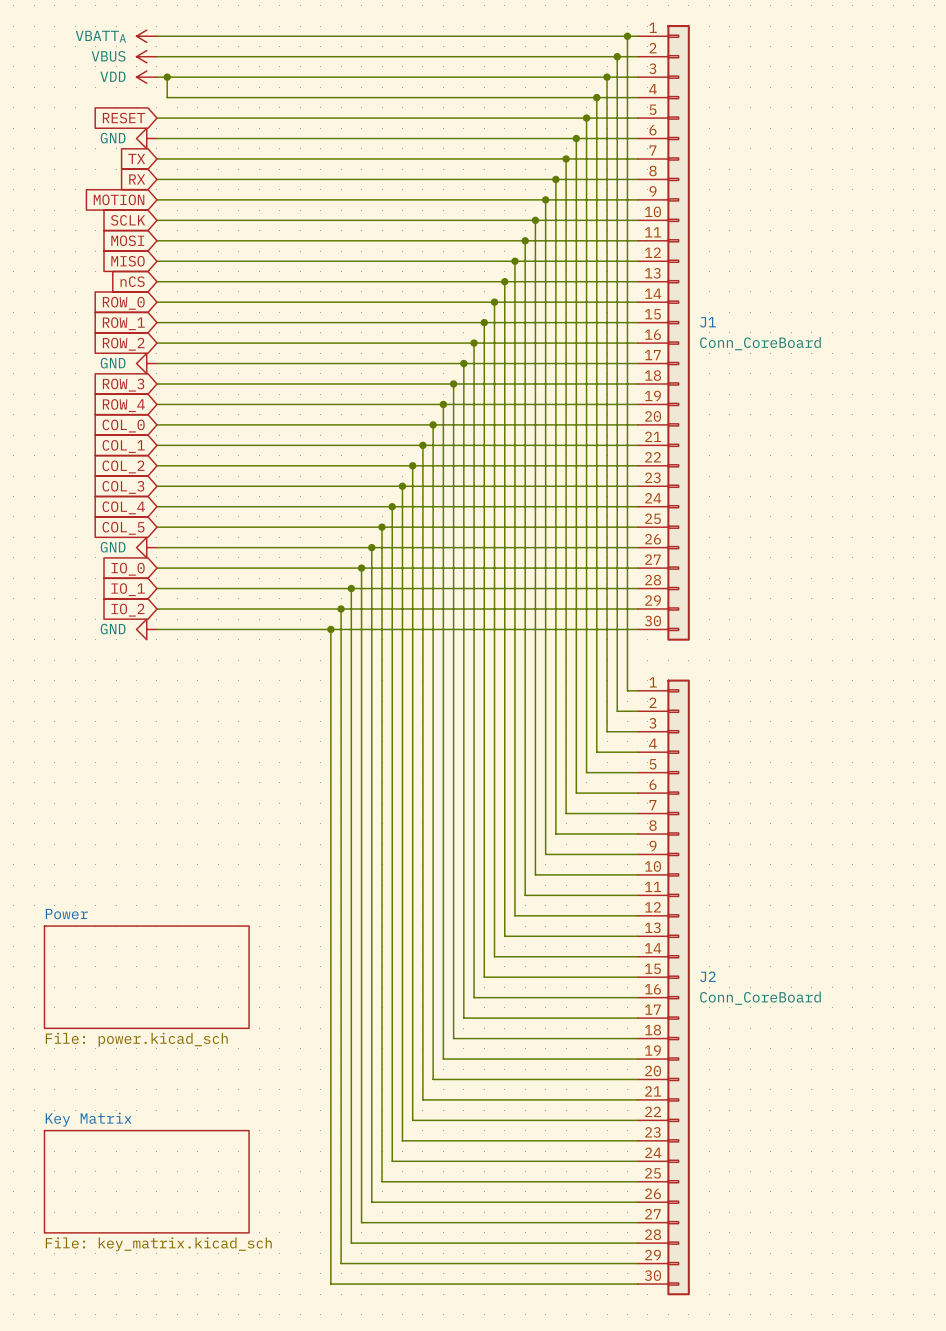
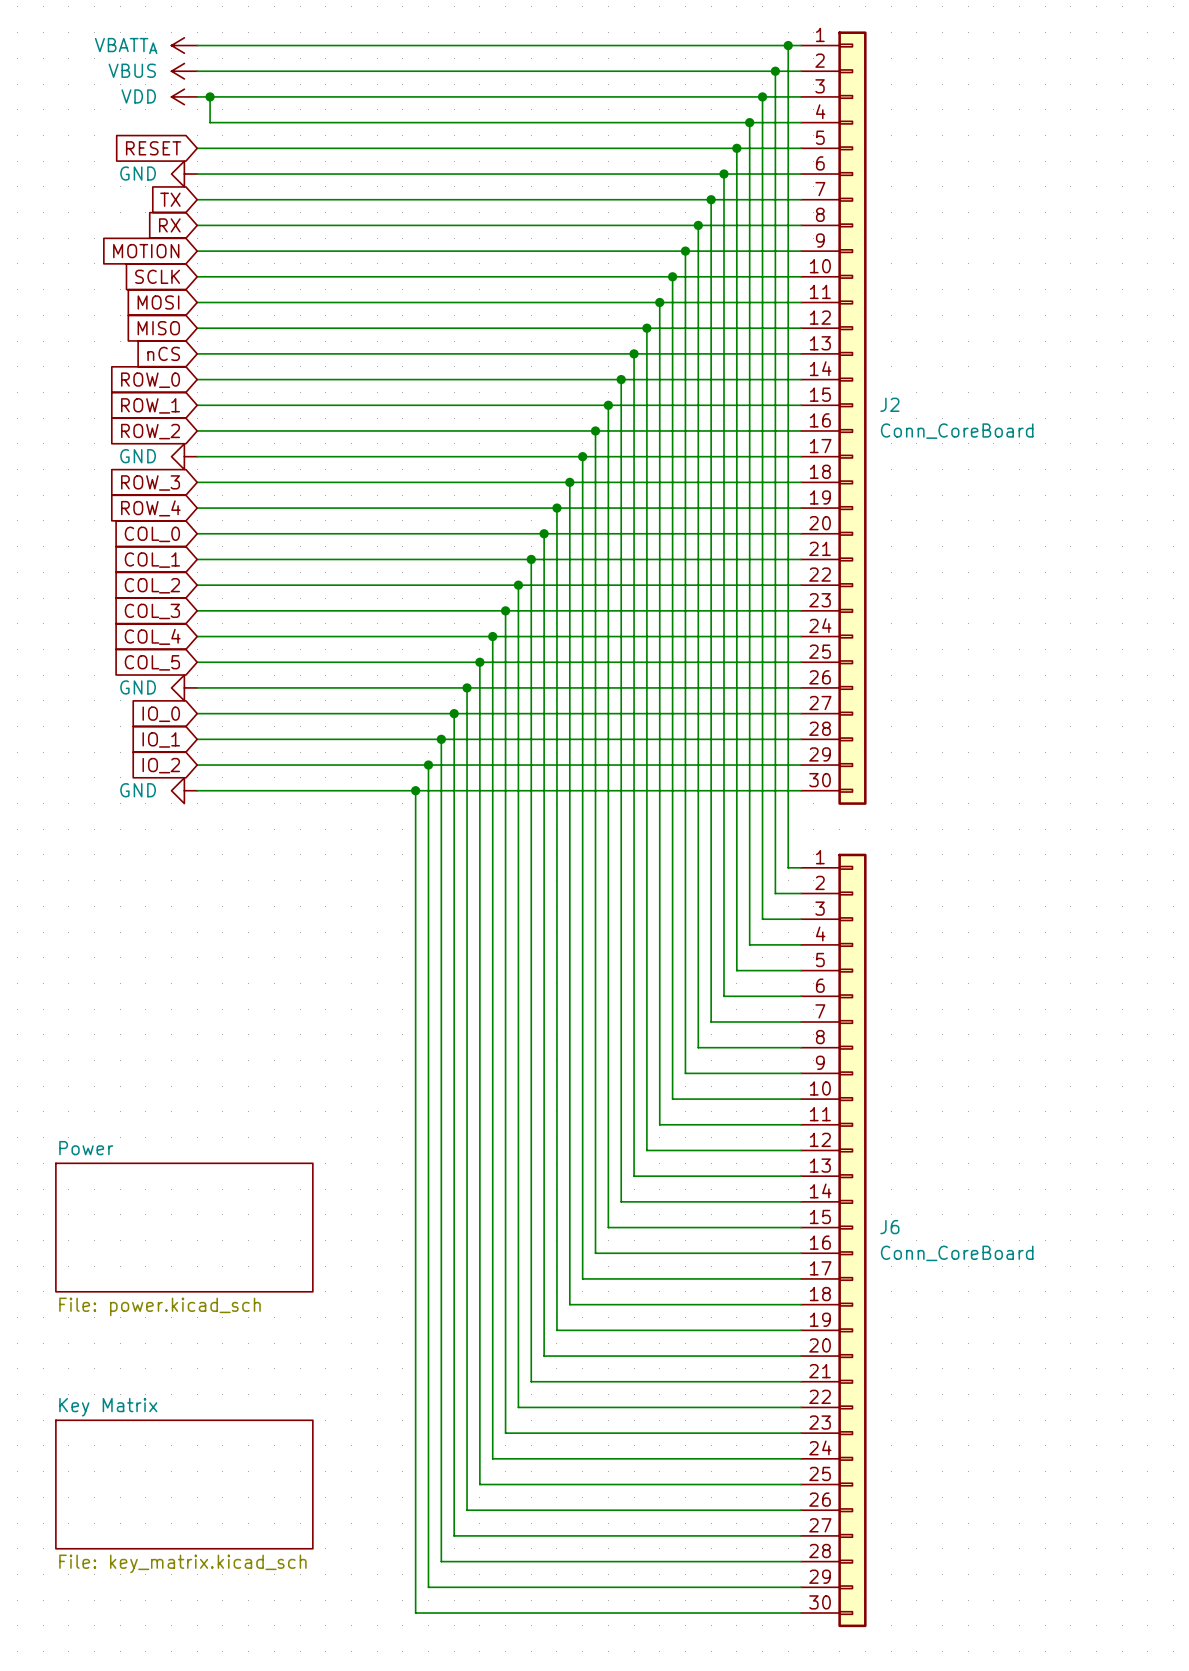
J1 name: J1 (708, 322) -> J2 (889, 404)
J2 name: J2 (707, 976) -> J6 (889, 1227)

